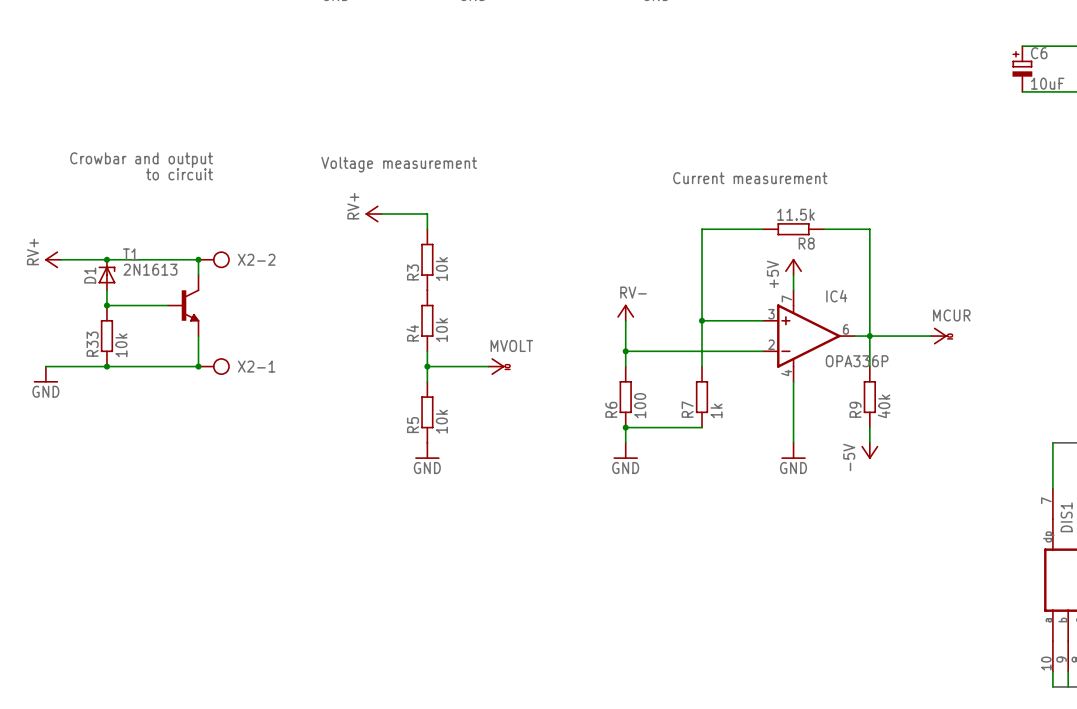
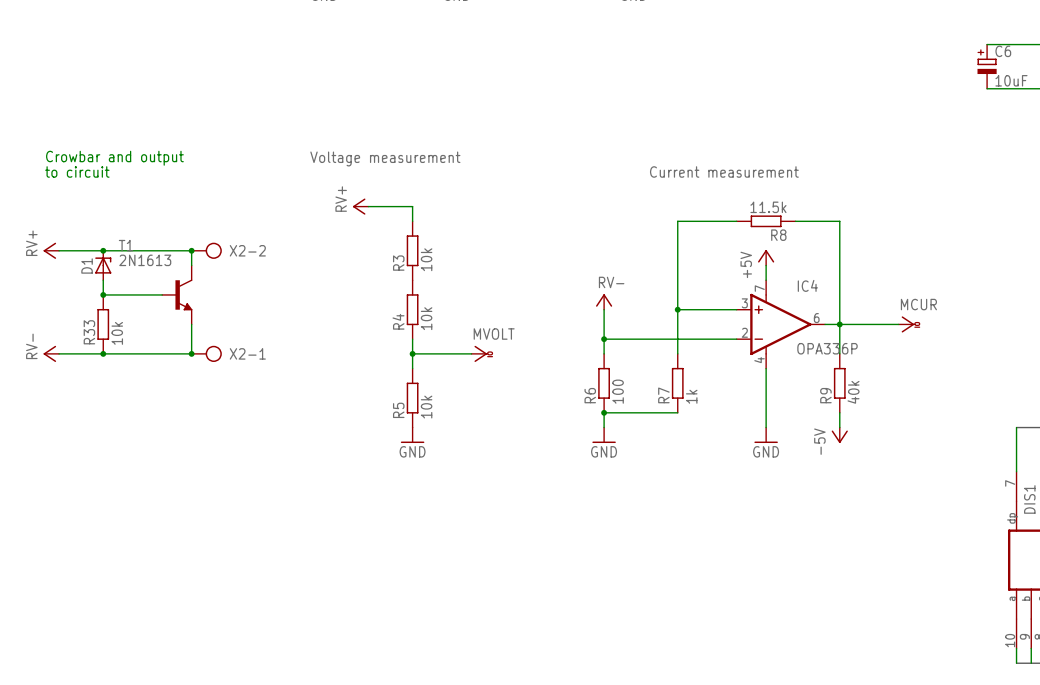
text: Crowbar and output (141, 160) -> none
text: none -> Crowbar and output (114, 158)
text: to circuit (179, 174) -> none
text: none -> to circuit (77, 171)
power symbol: none -> RV- (51, 353)
power symbol: GND (45, 374) -> none

